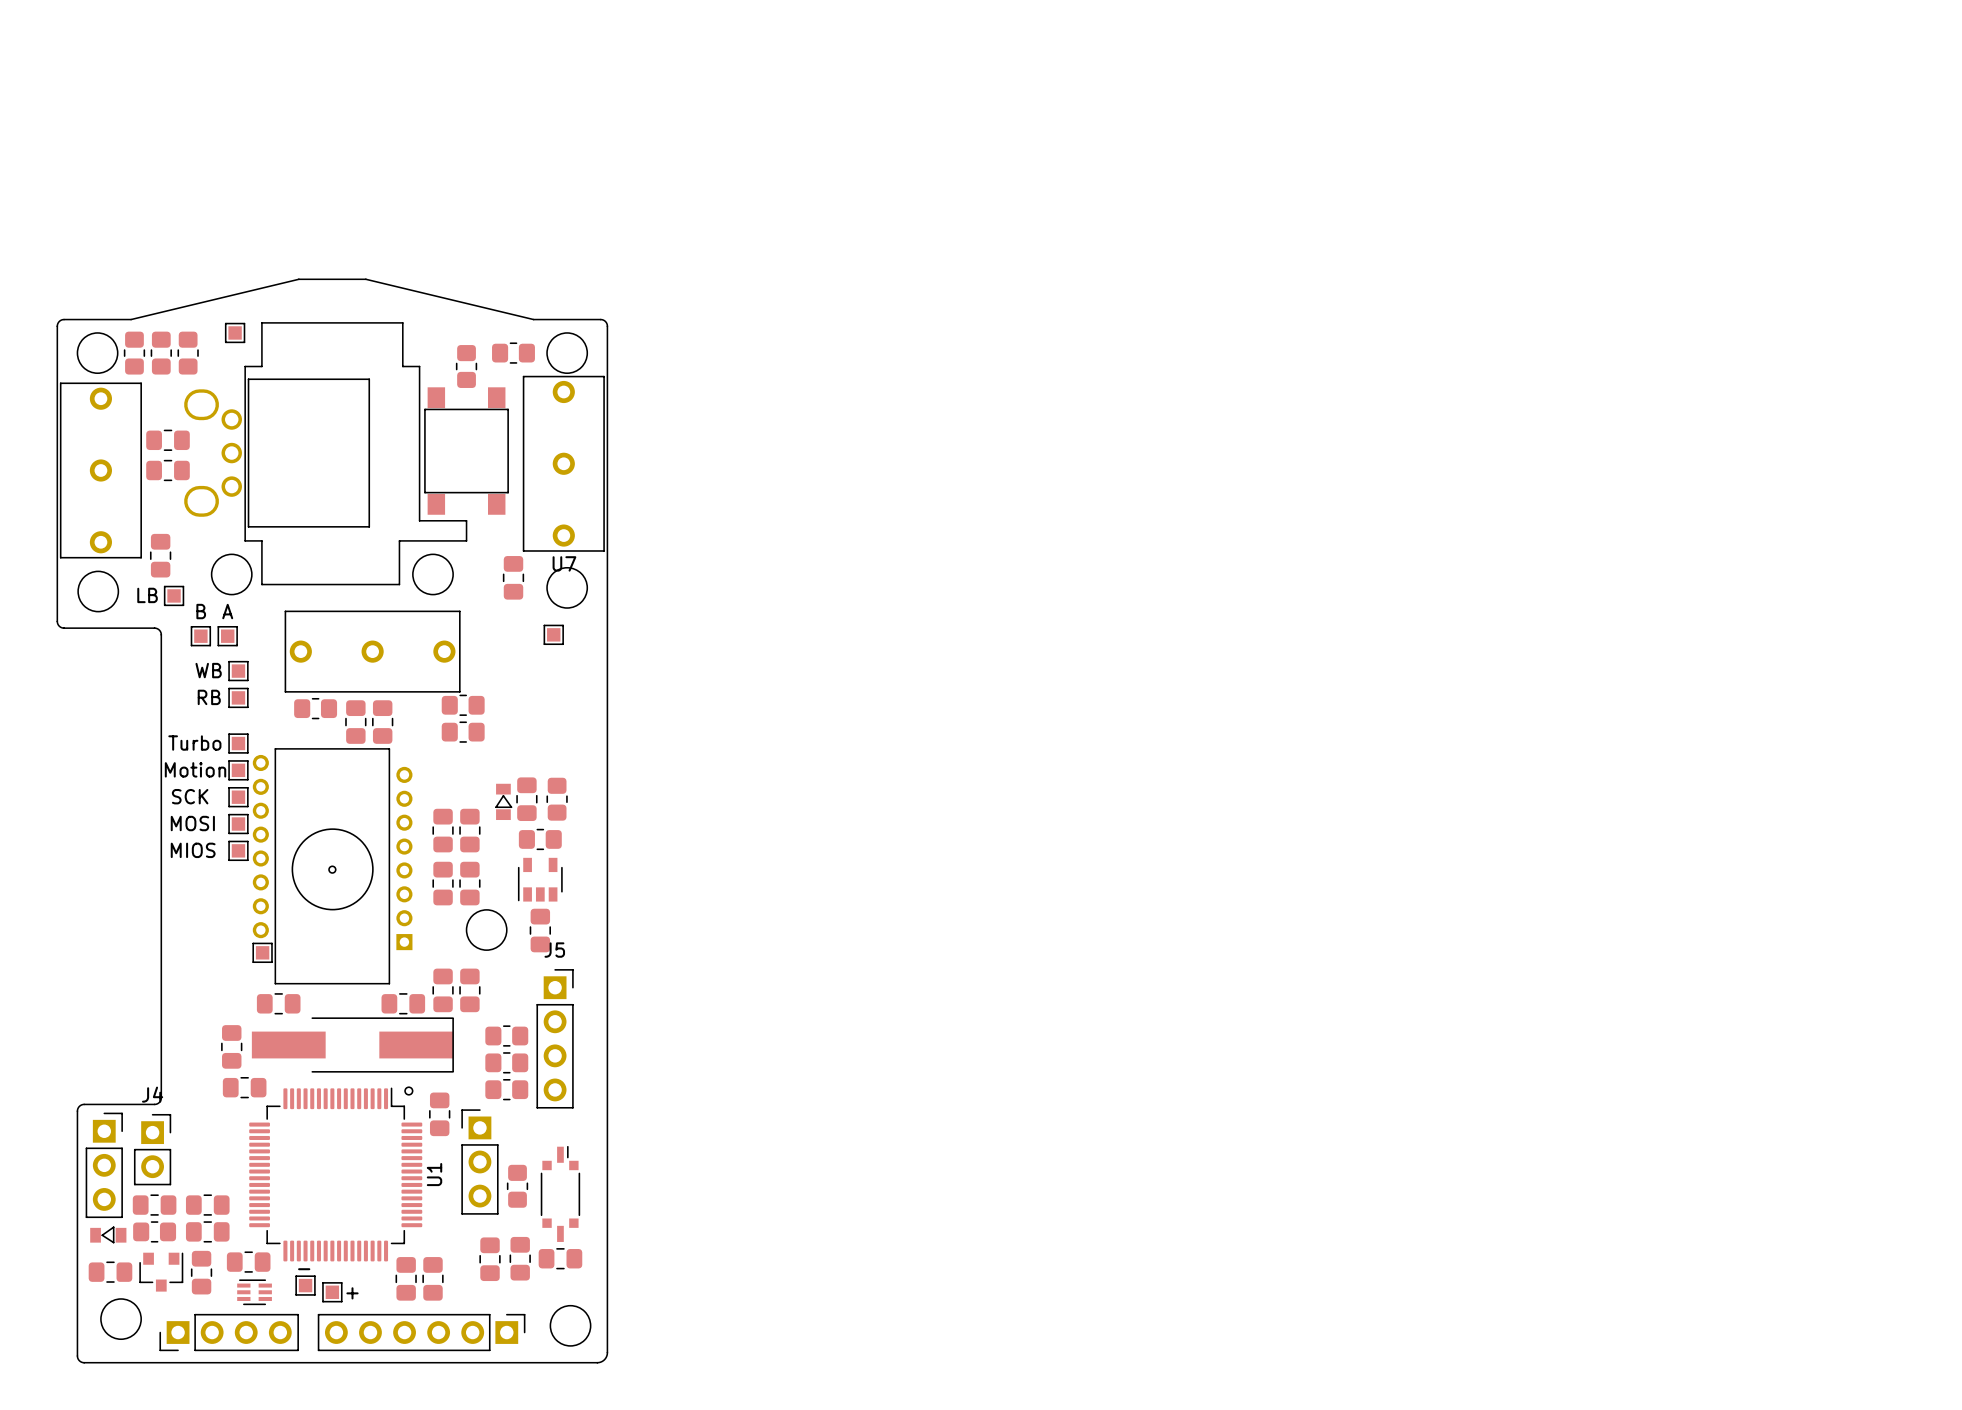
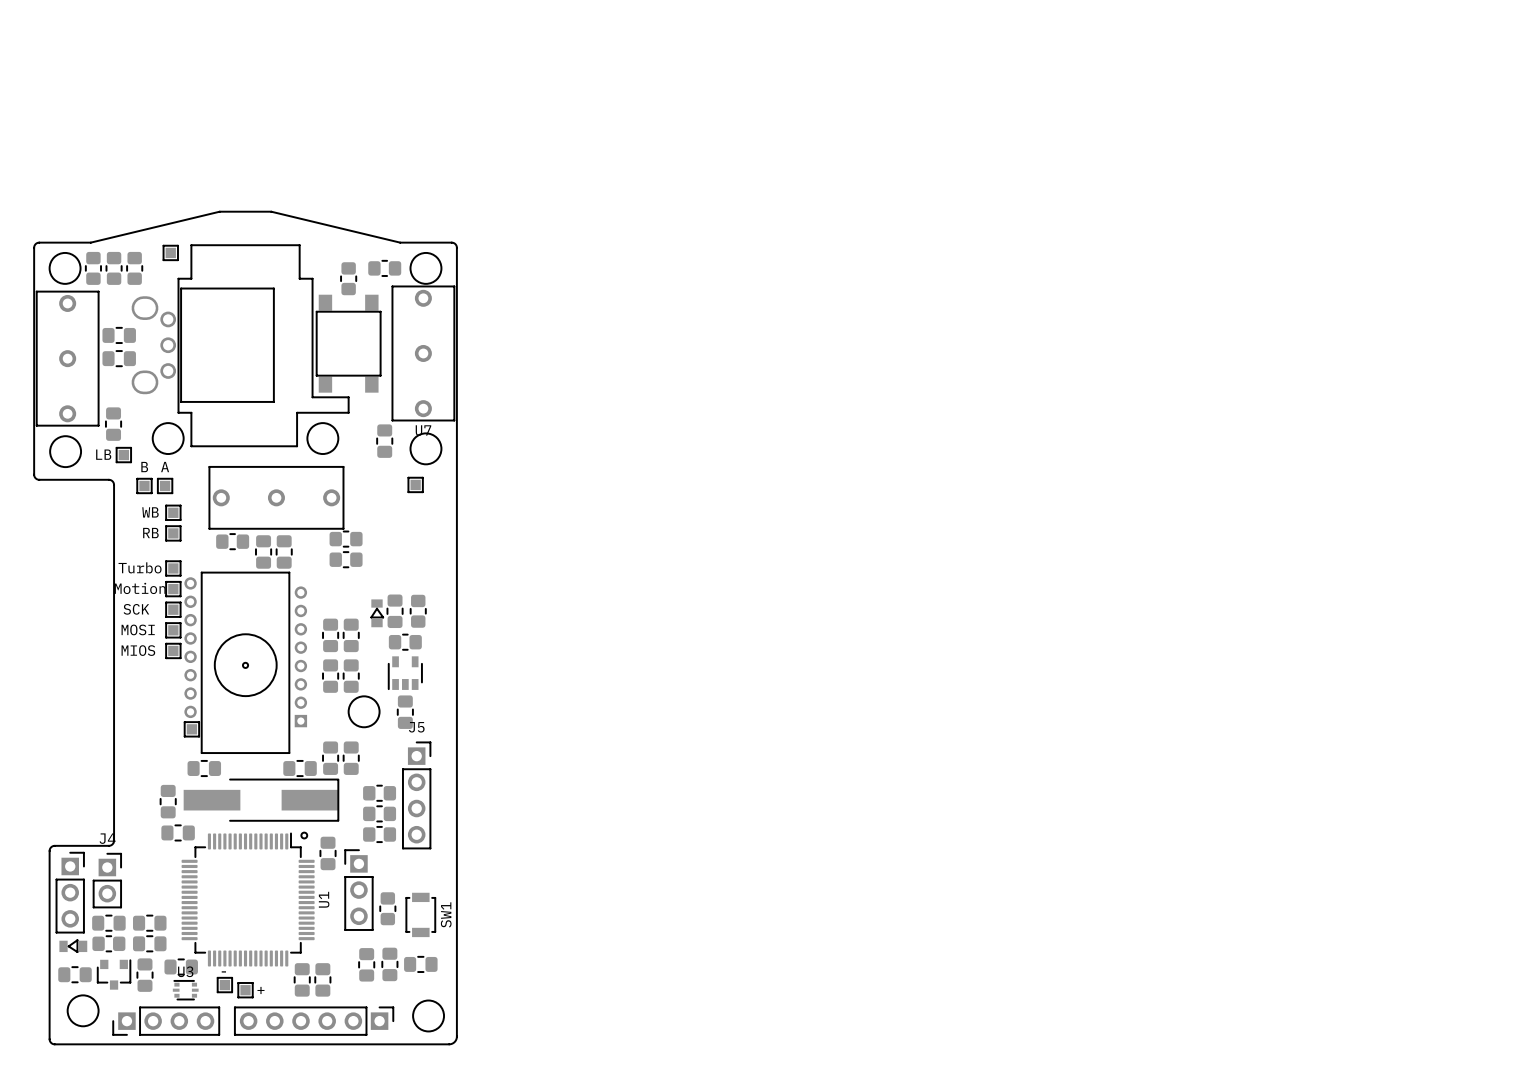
part: (560, 1193) -> none
SW1: none -> (420, 914)
part: (254, 1292) -> none
U3: none -> (185, 990)

